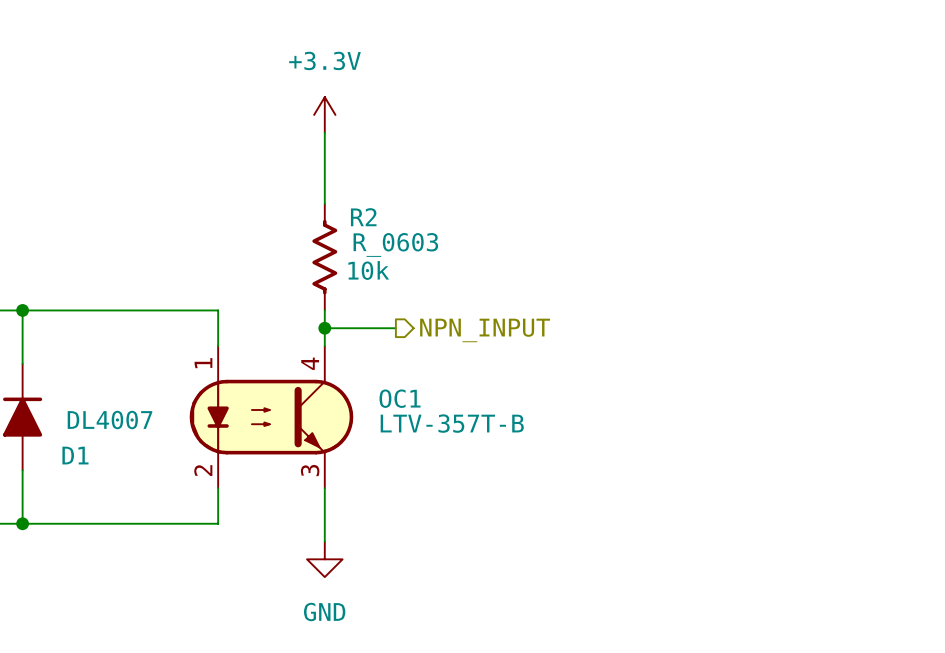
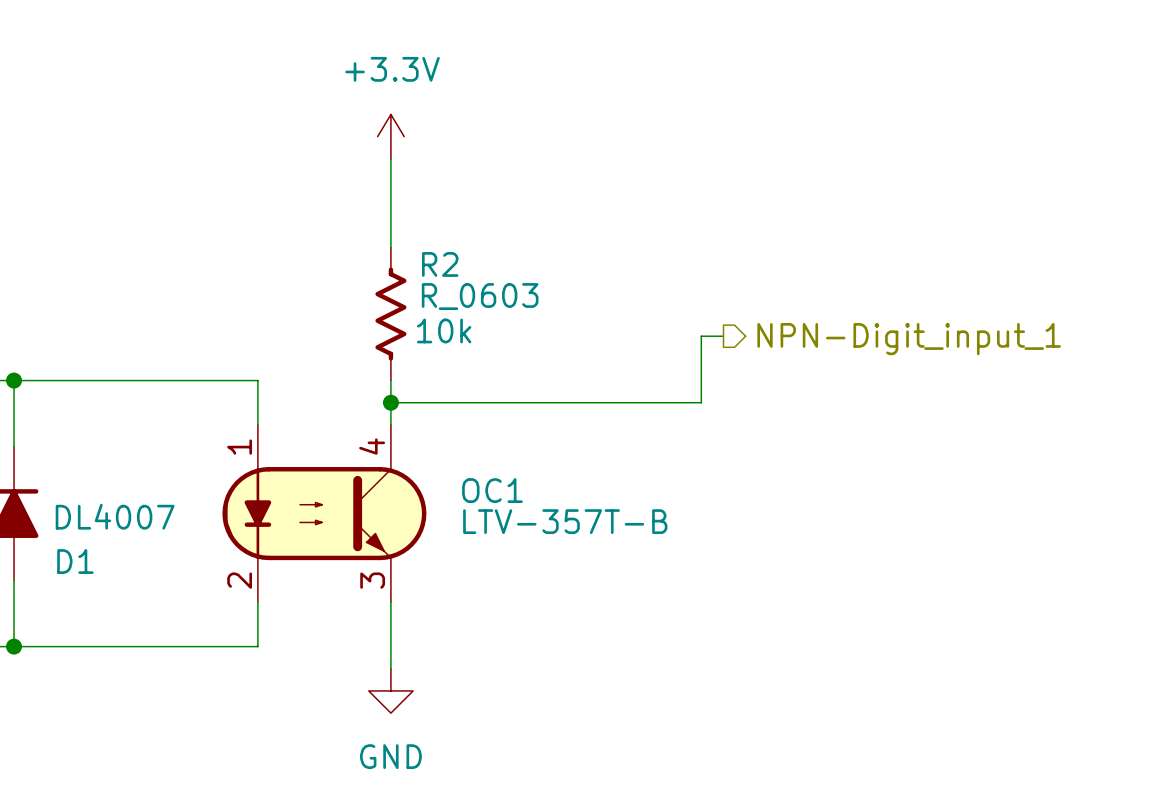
wire: none -> (723, 336) (701, 336) (701, 402) (479, 402)
hierarchical label: none -> NPN-Digit_input_1 (909, 339)
hierarchical label: NPN_INPUT (485, 330) -> none

